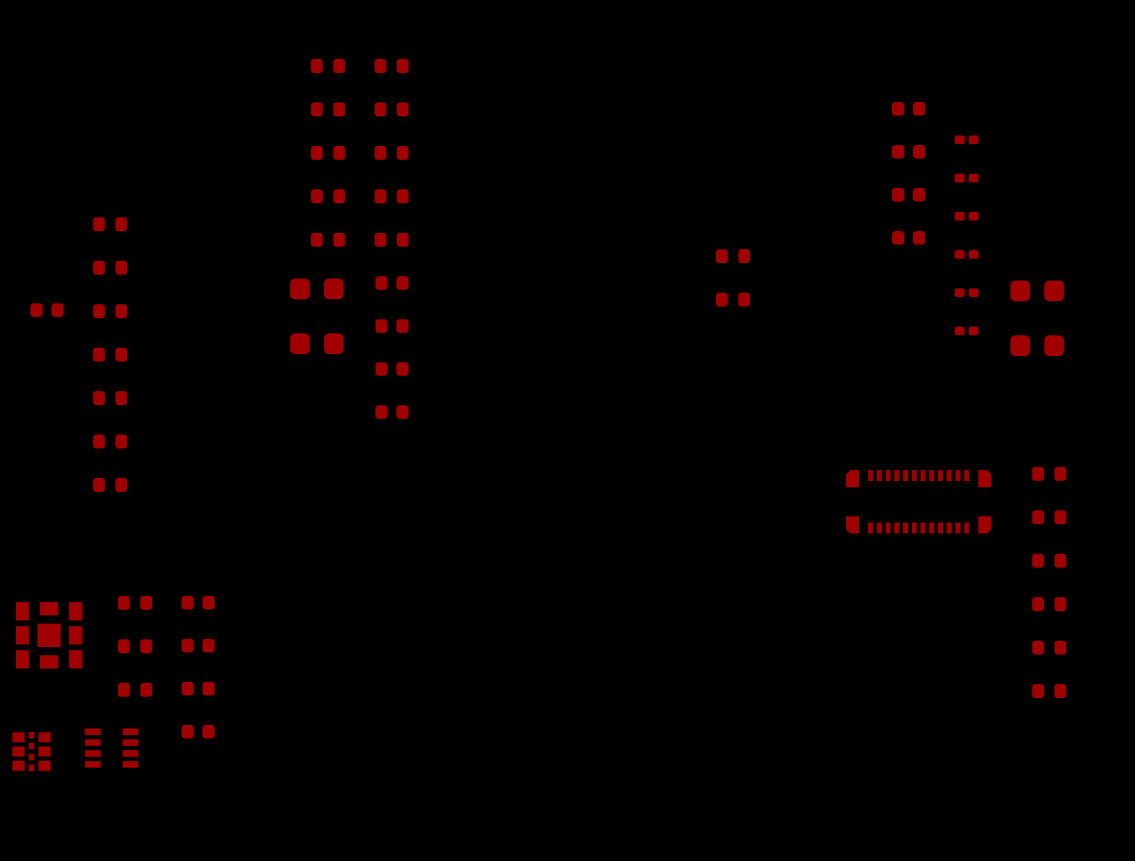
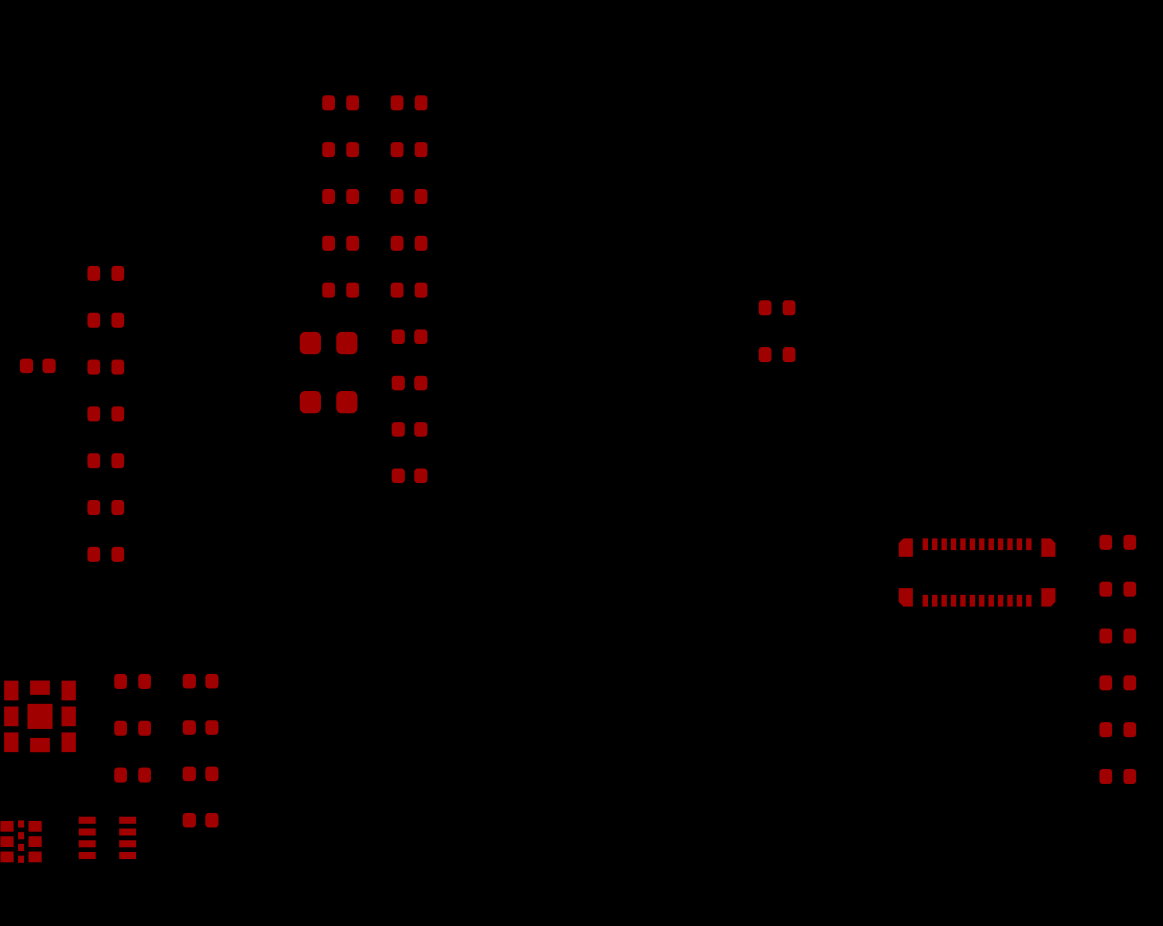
part: (908, 108) -> none
part: (966, 139) -> none
part: (908, 151) -> none
part: (966, 178) -> none
part: (908, 194) -> none
part: (966, 216) -> none
part: (908, 237) -> none
part: (966, 254) -> none
part: (1037, 290) -> none
part: (966, 292) -> none
part: (966, 330) -> none
part: (1037, 345) -> none

